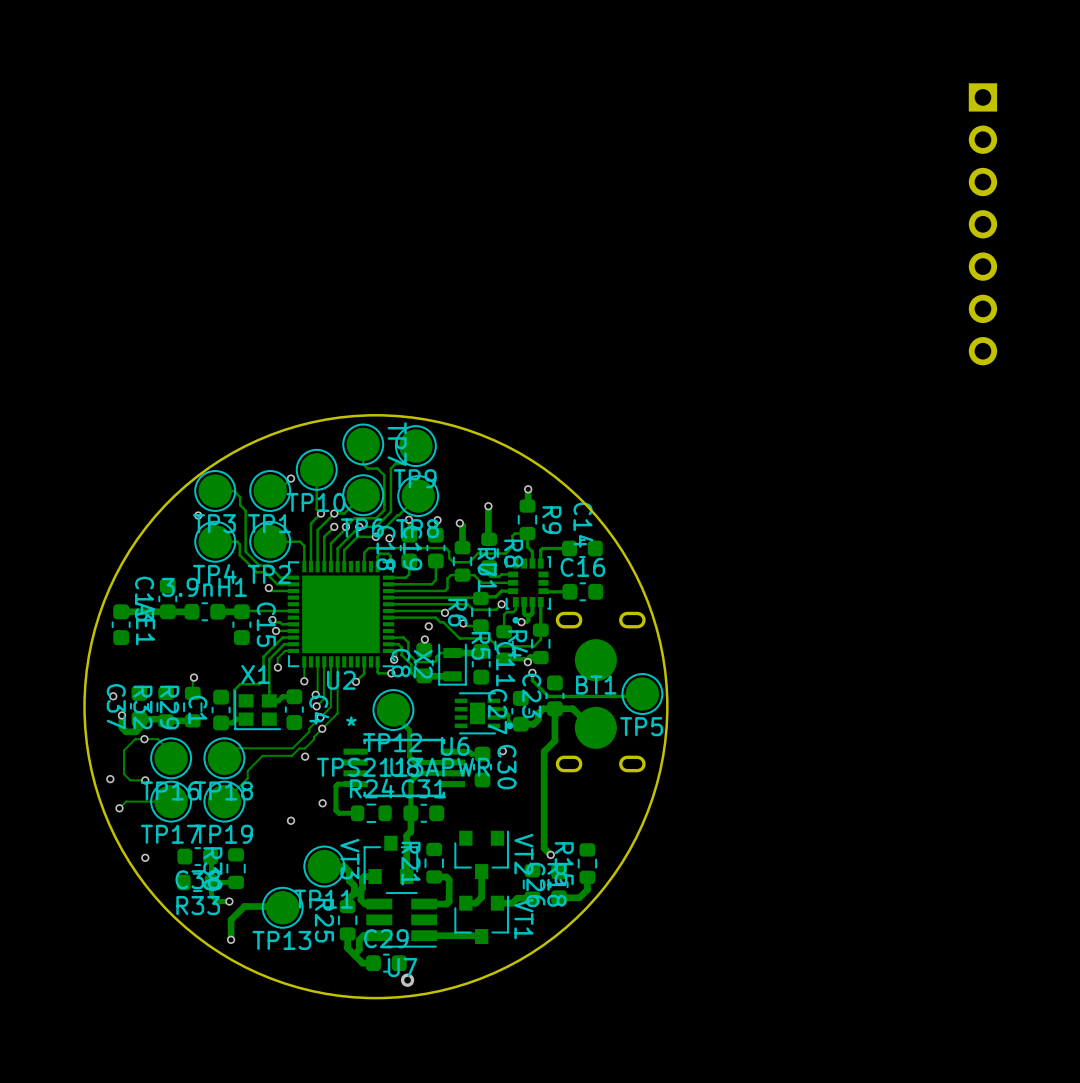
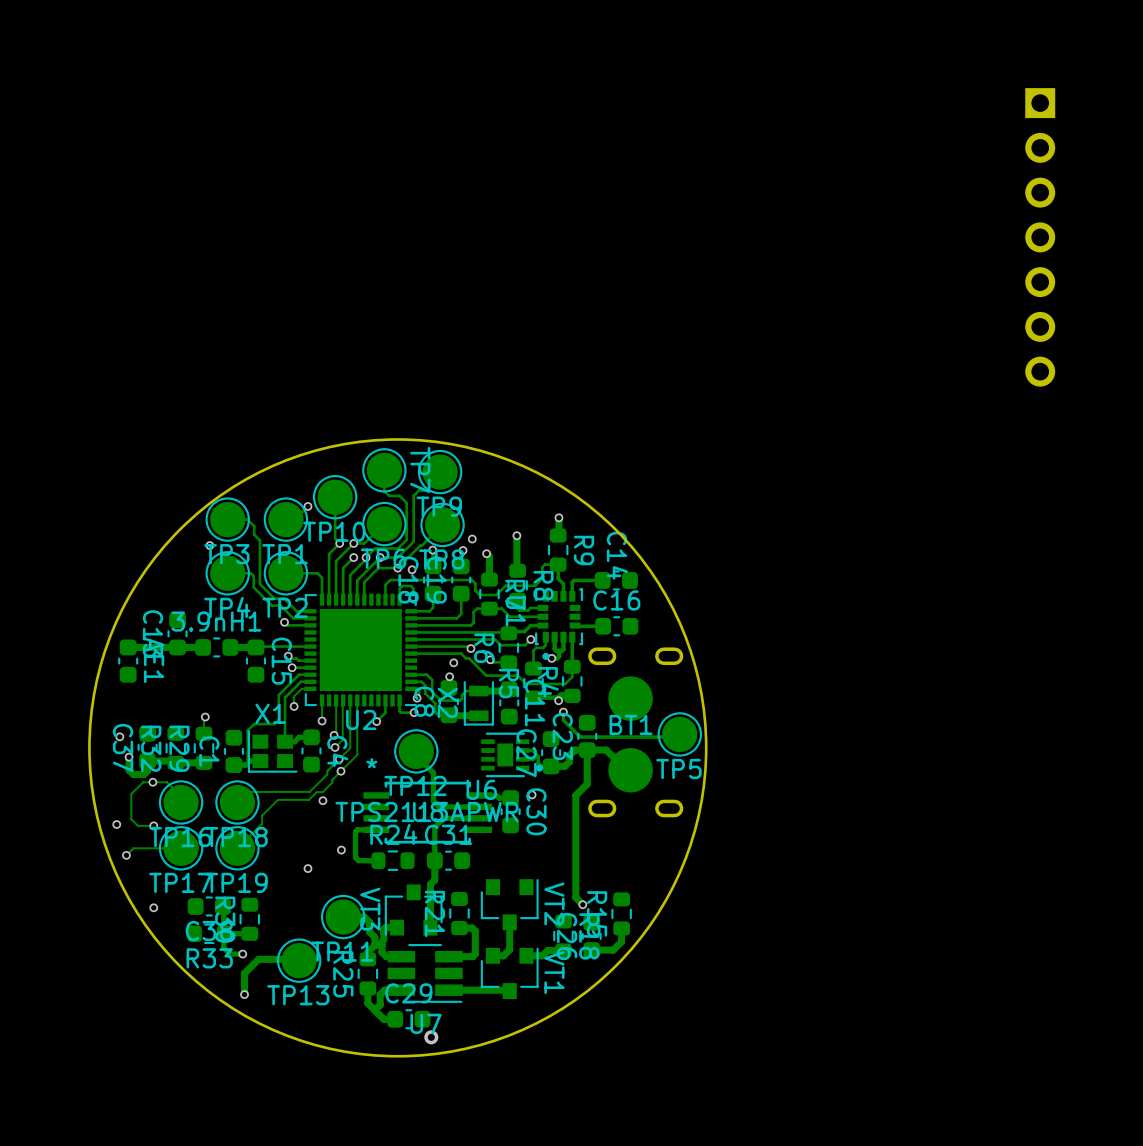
via: none -> (472, 539)

